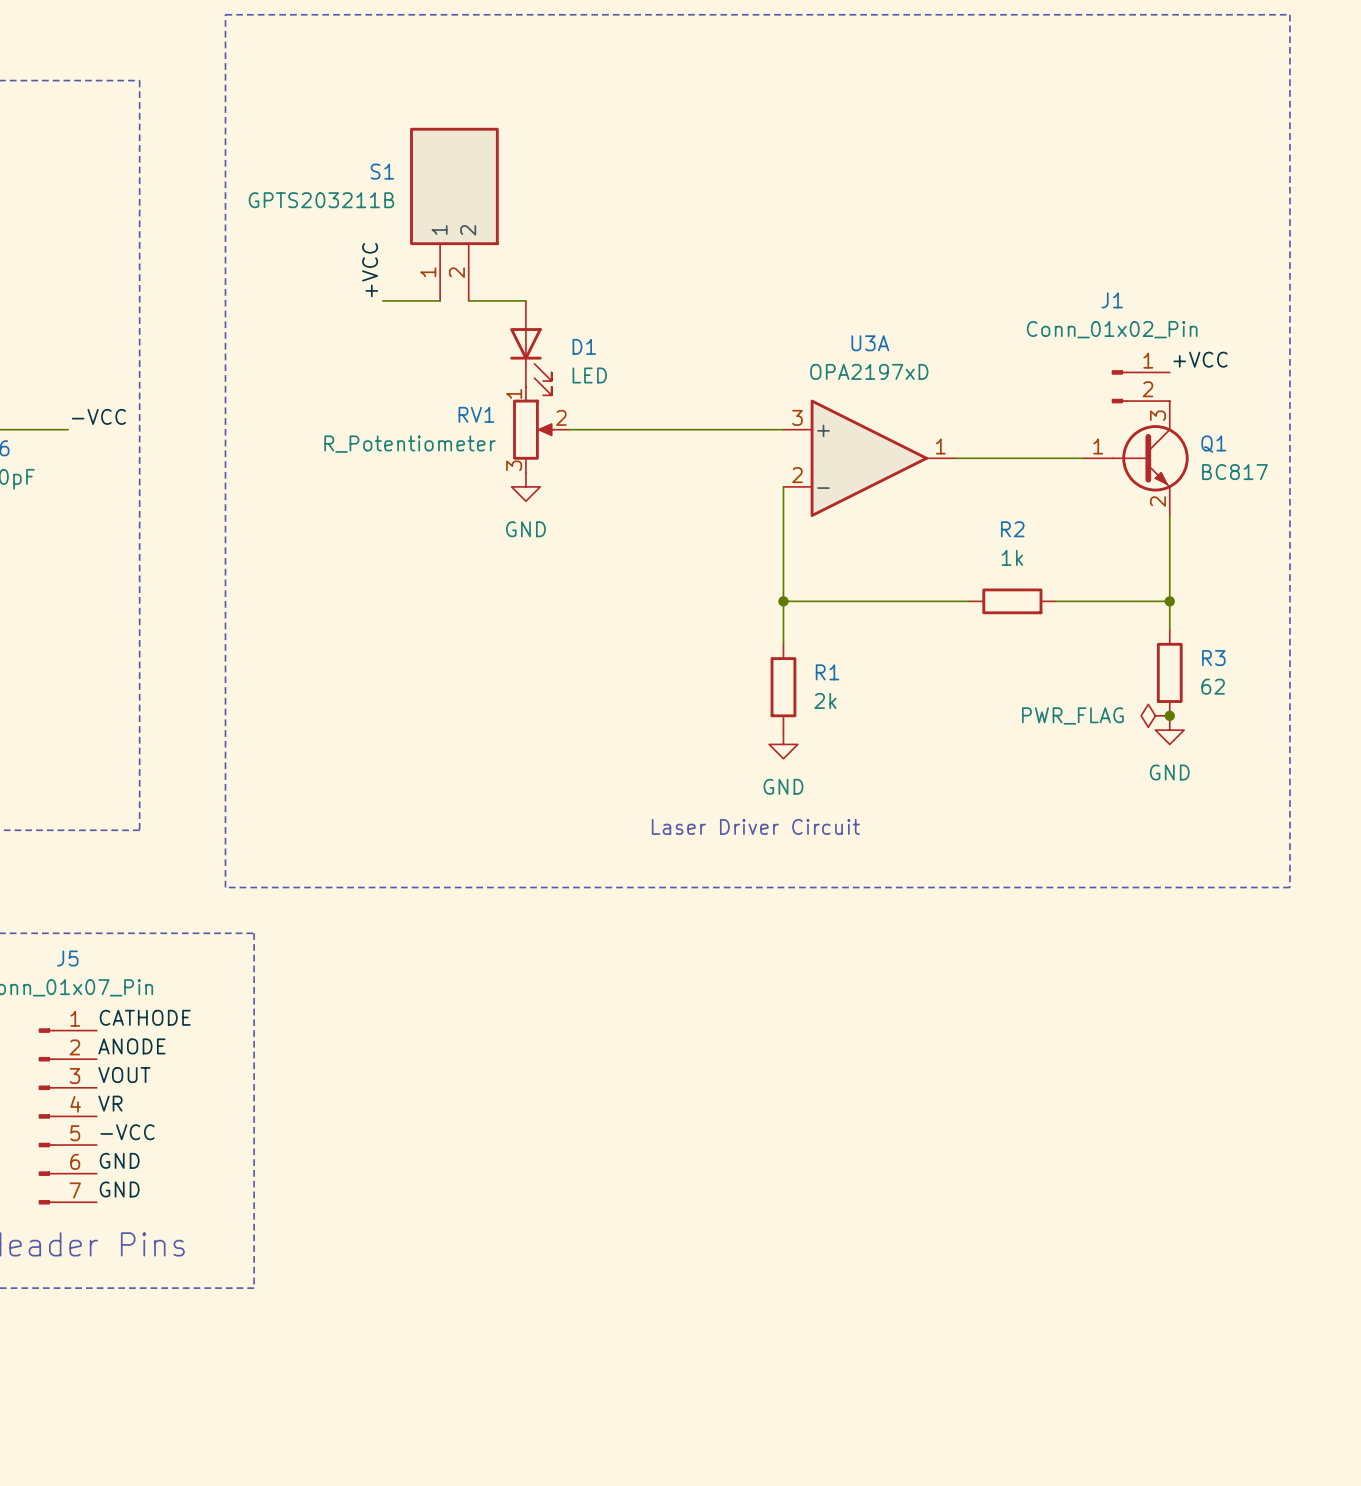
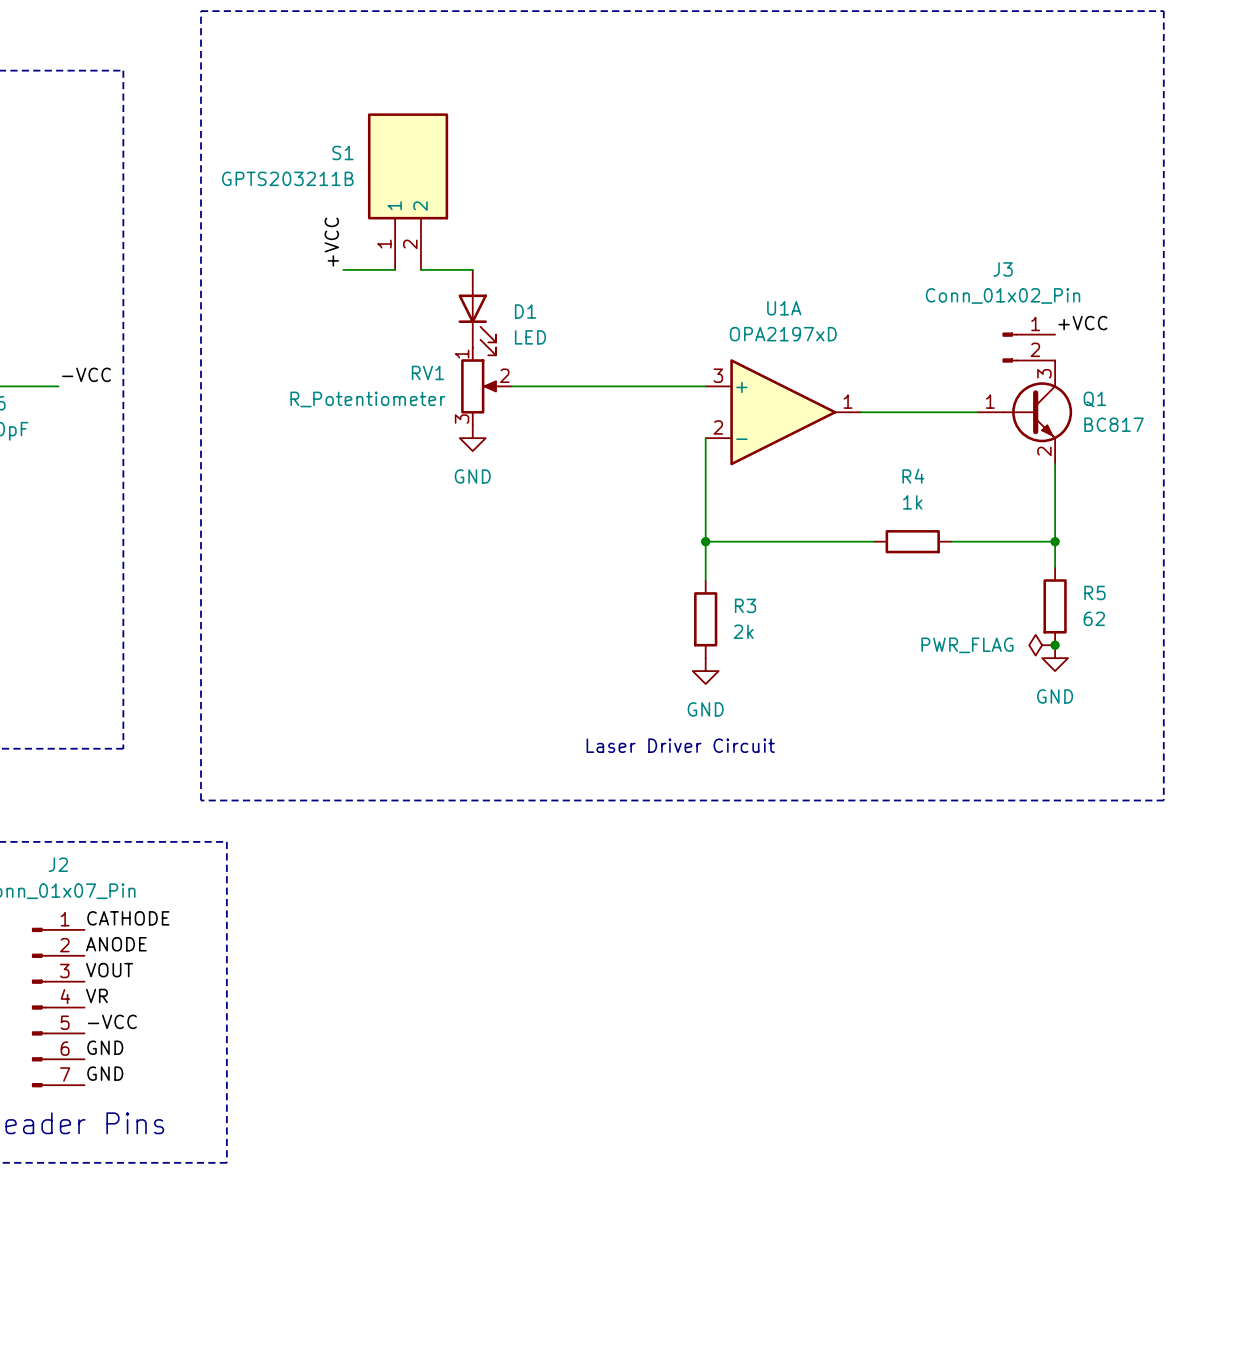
J1 name: J1 (1112, 300) -> J3 (1003, 269)
U3A name: U3A (870, 343) -> U1A (784, 308)
R2 name: R2 (1012, 529) -> R4 (913, 476)
R3 name: R3 (1213, 658) -> R5 (1094, 592)
R1 name: R1 (827, 672) -> R3 (745, 605)
J5 name: J5 (67, 958) -> J2 (58, 864)

